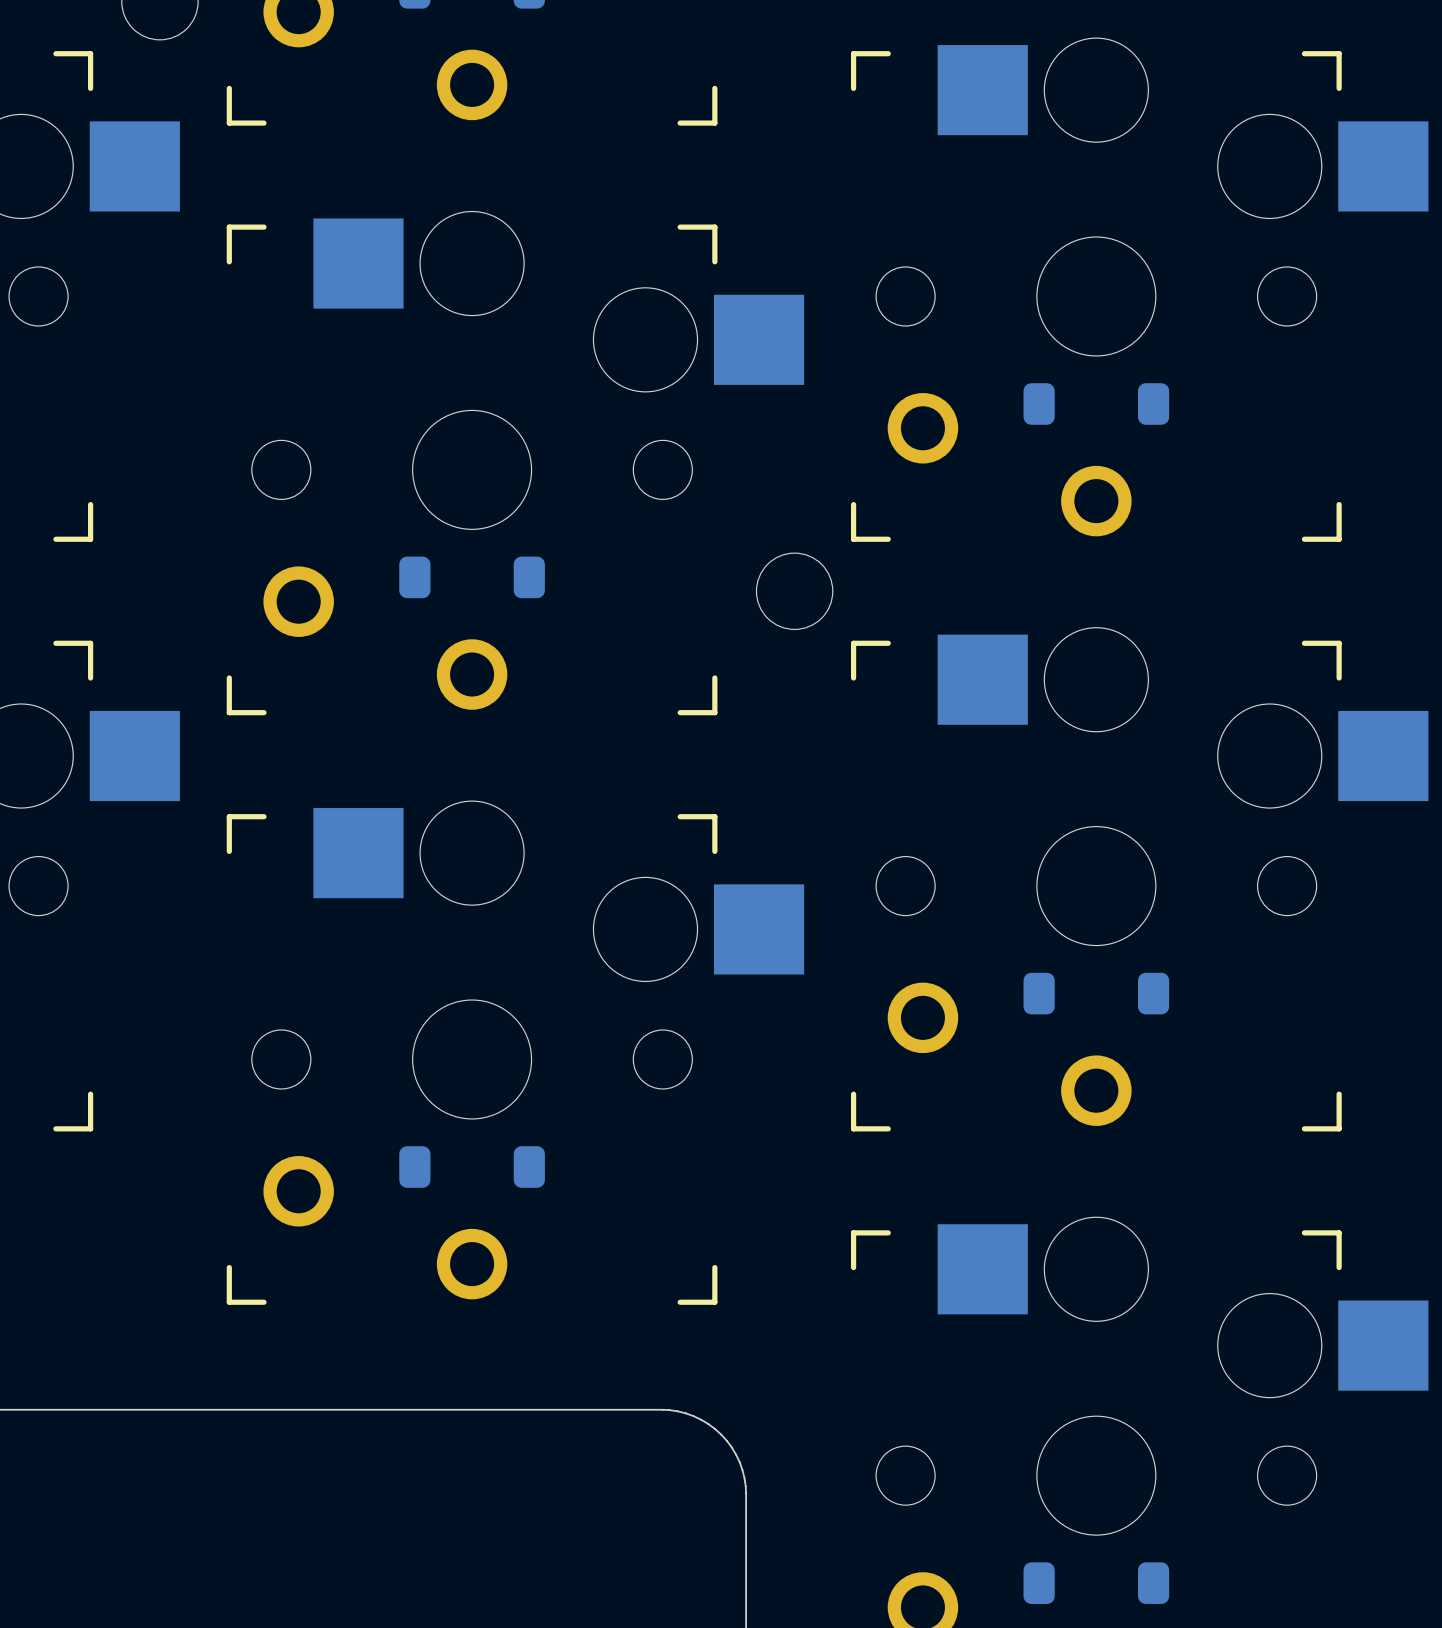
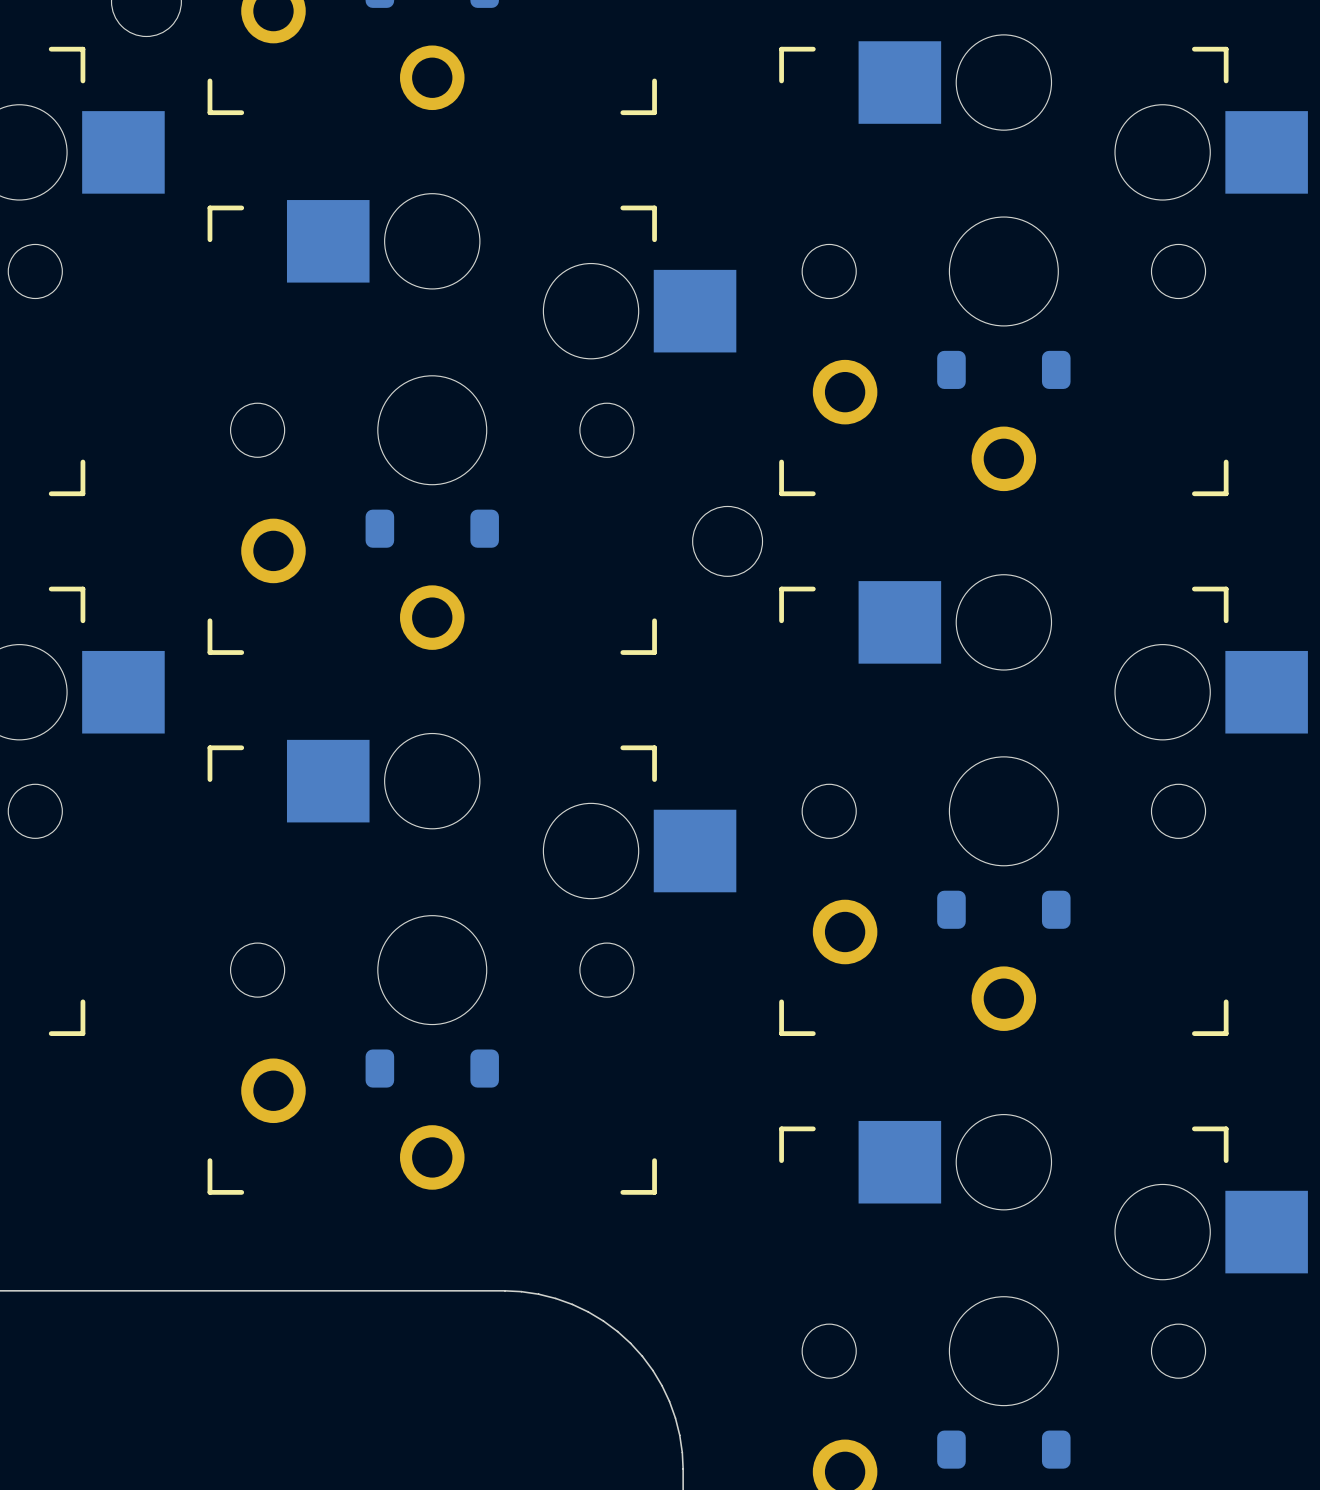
board edge: (551, 1409) (669, 1410) (685, 1413) (701, 1419) (721, 1434) (736, 1454) (742, 1470) (745, 1486) (746, 1604) -> (504, 1290) (538, 1294) (572, 1304) (603, 1321) (630, 1343) (652, 1370) (669, 1401) (679, 1435) (683, 1468)

